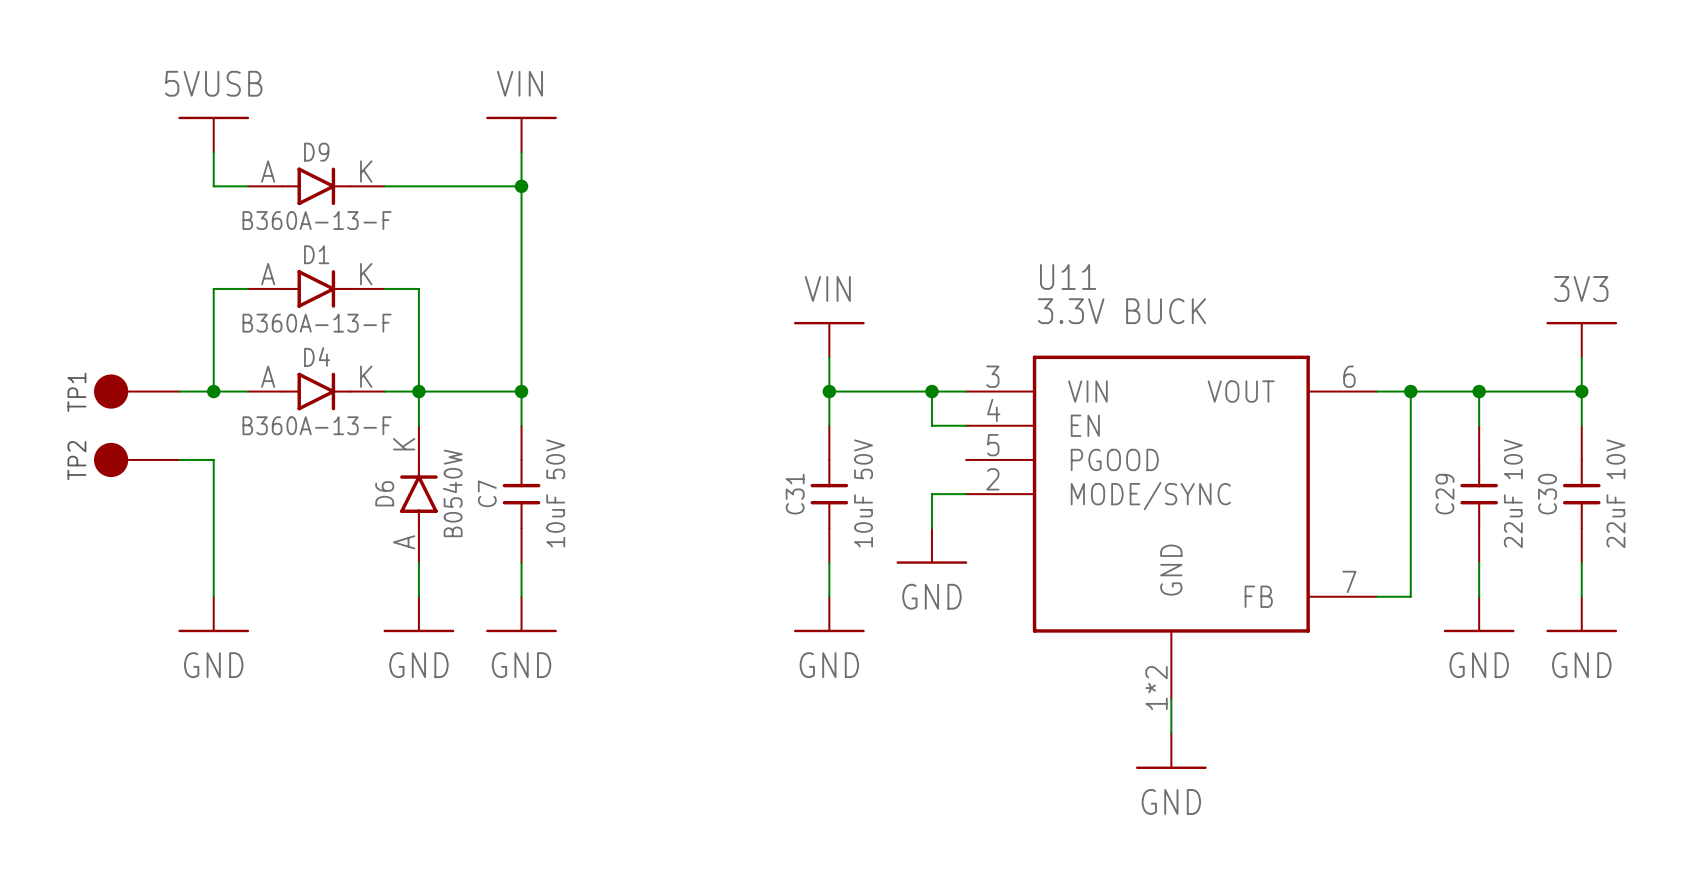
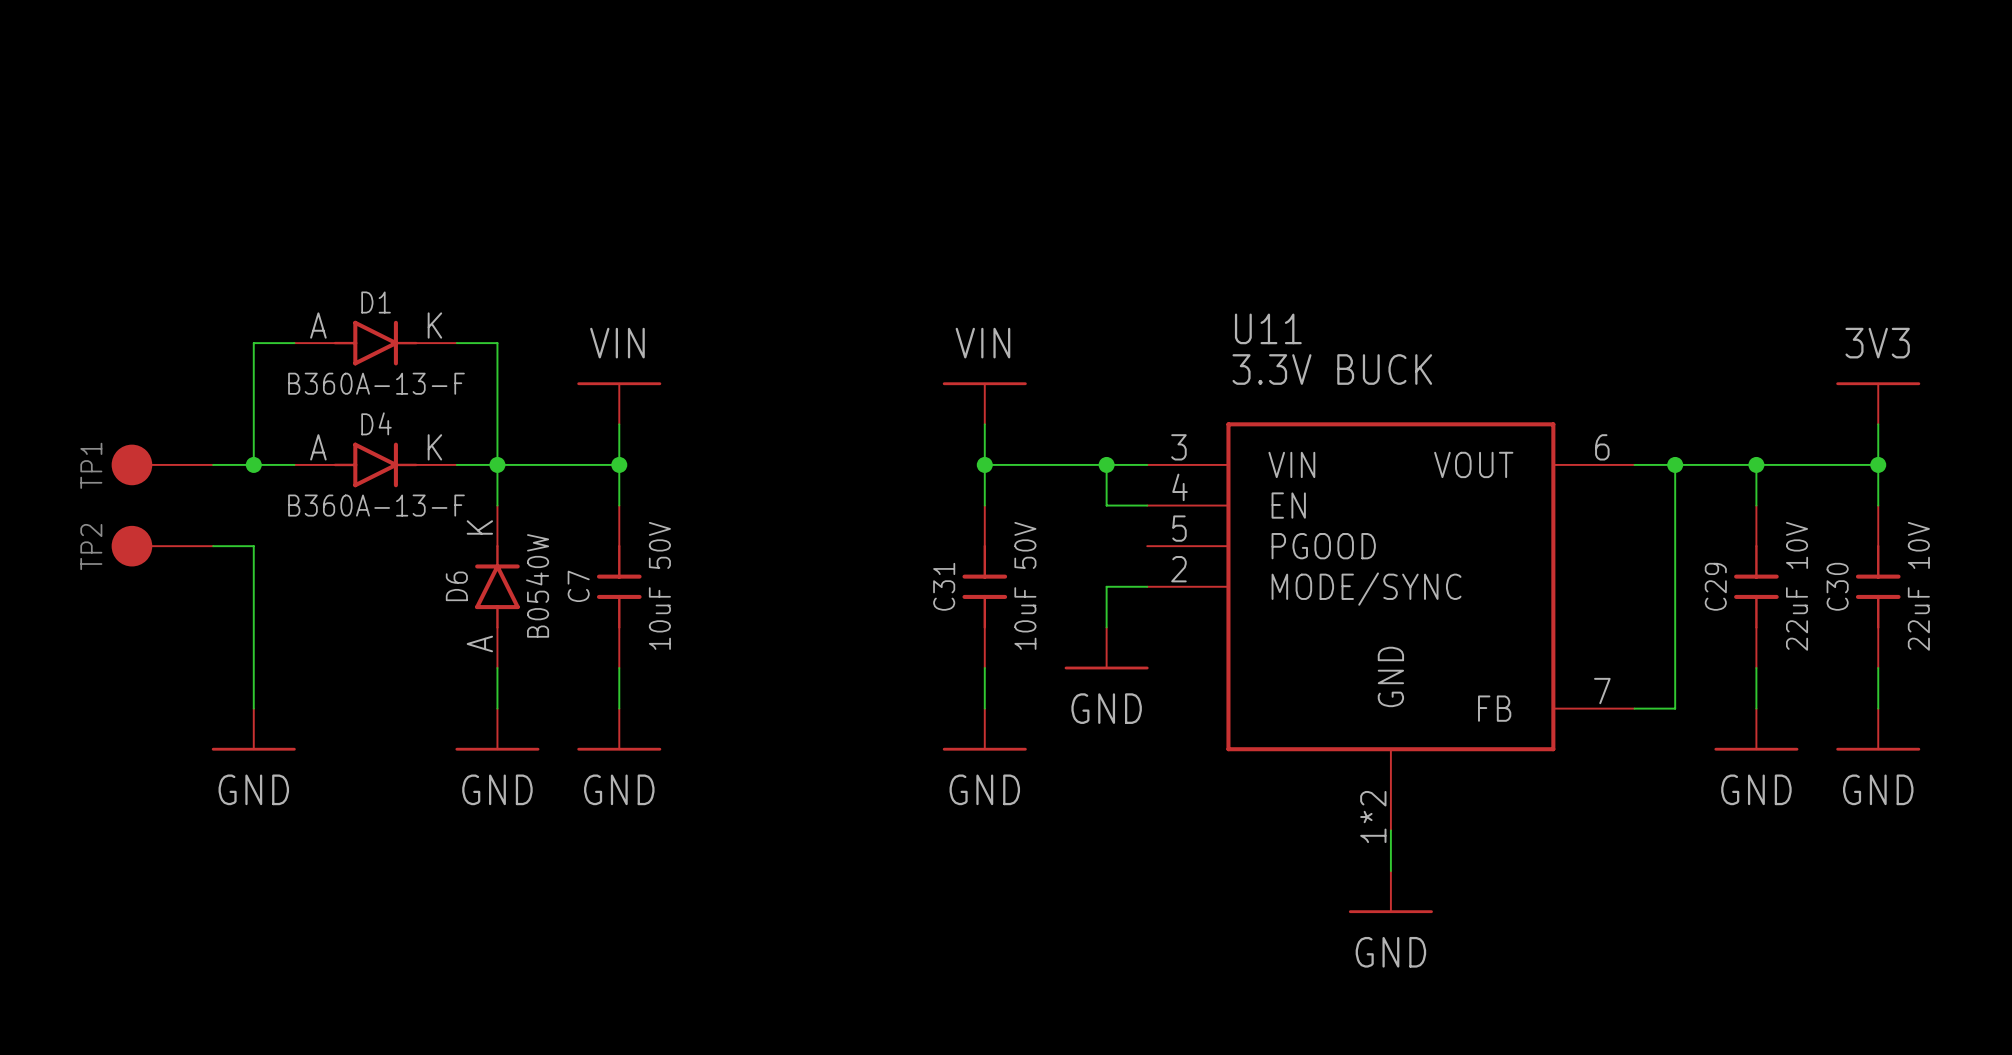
power symbol: 5VUSB (213, 134) -> none
power symbol position: VIN (521, 134) -> VIN (619, 403)
wire: (213, 152) (213, 186) (247, 186) -> none
wire: (521, 152) (521, 357) -> none
D9: B360A-13-F (316, 186) -> none
wire: (384, 186) (521, 186) -> none
junction: (521, 186) -> none

